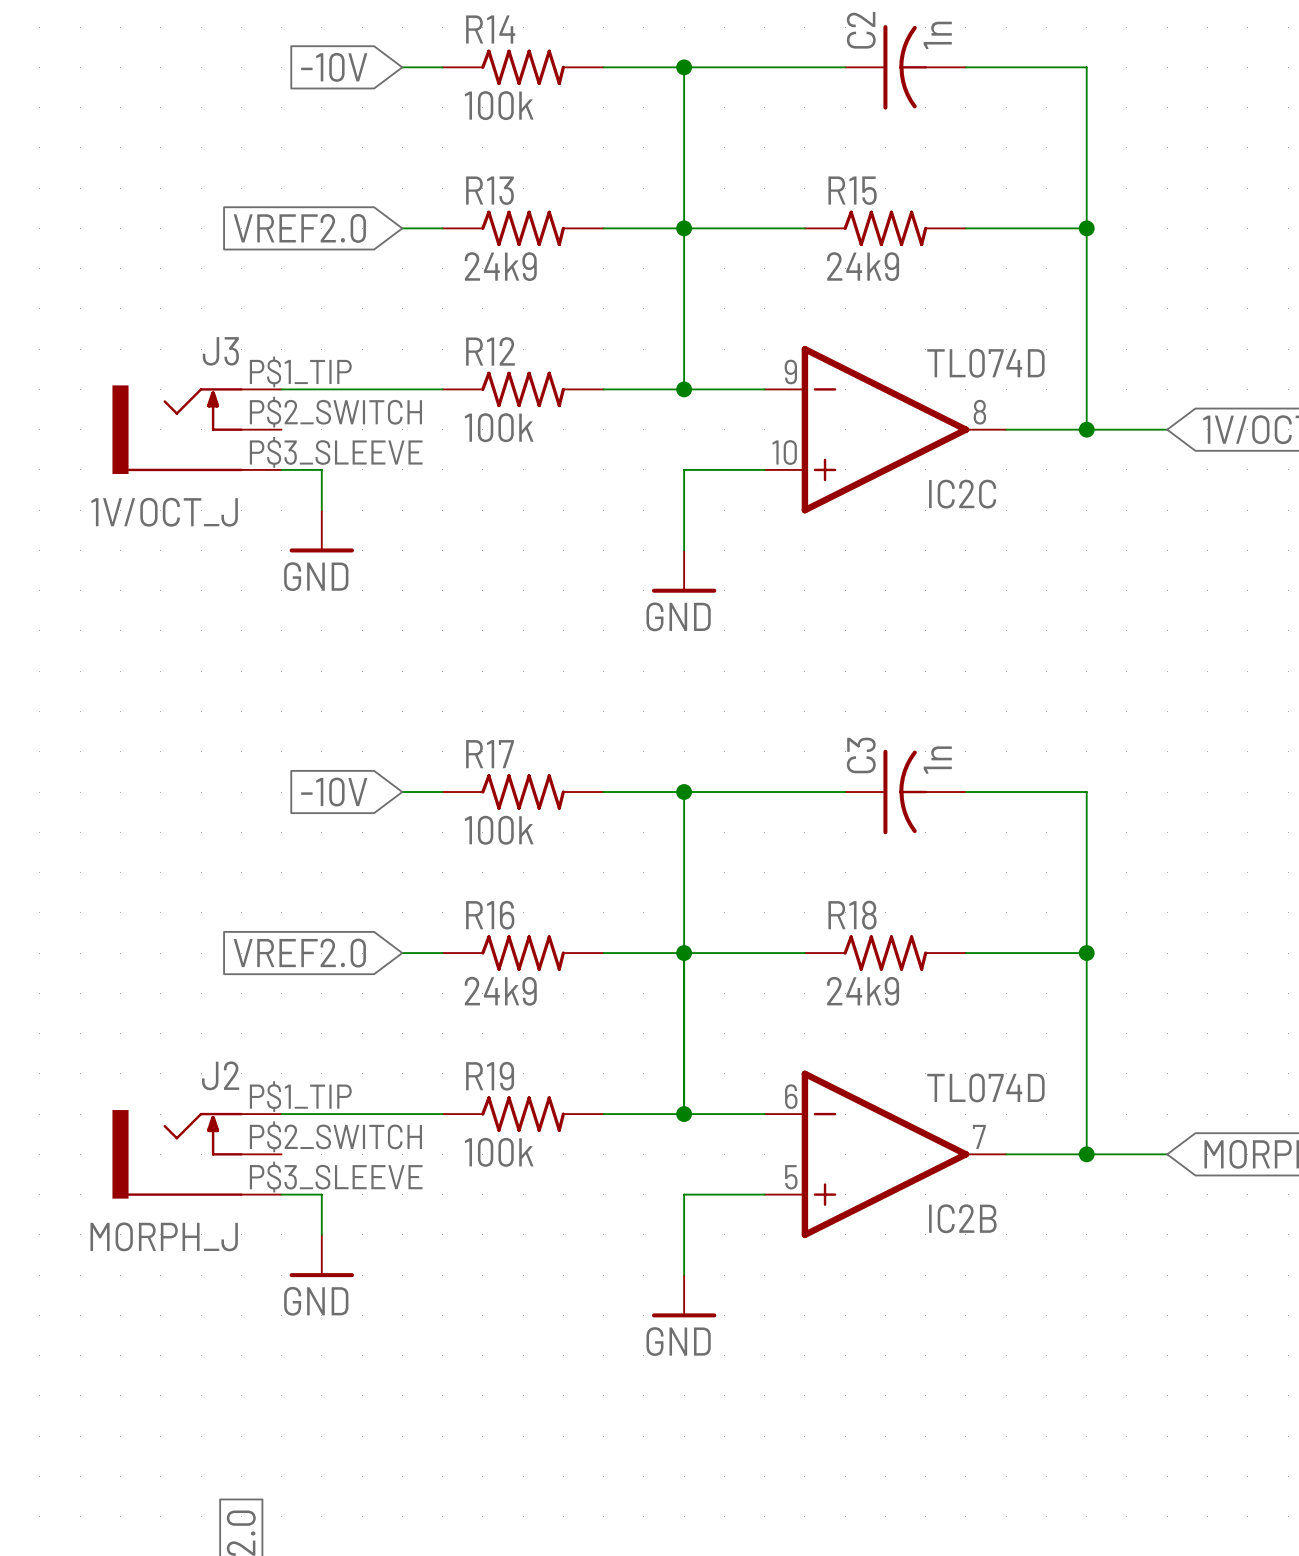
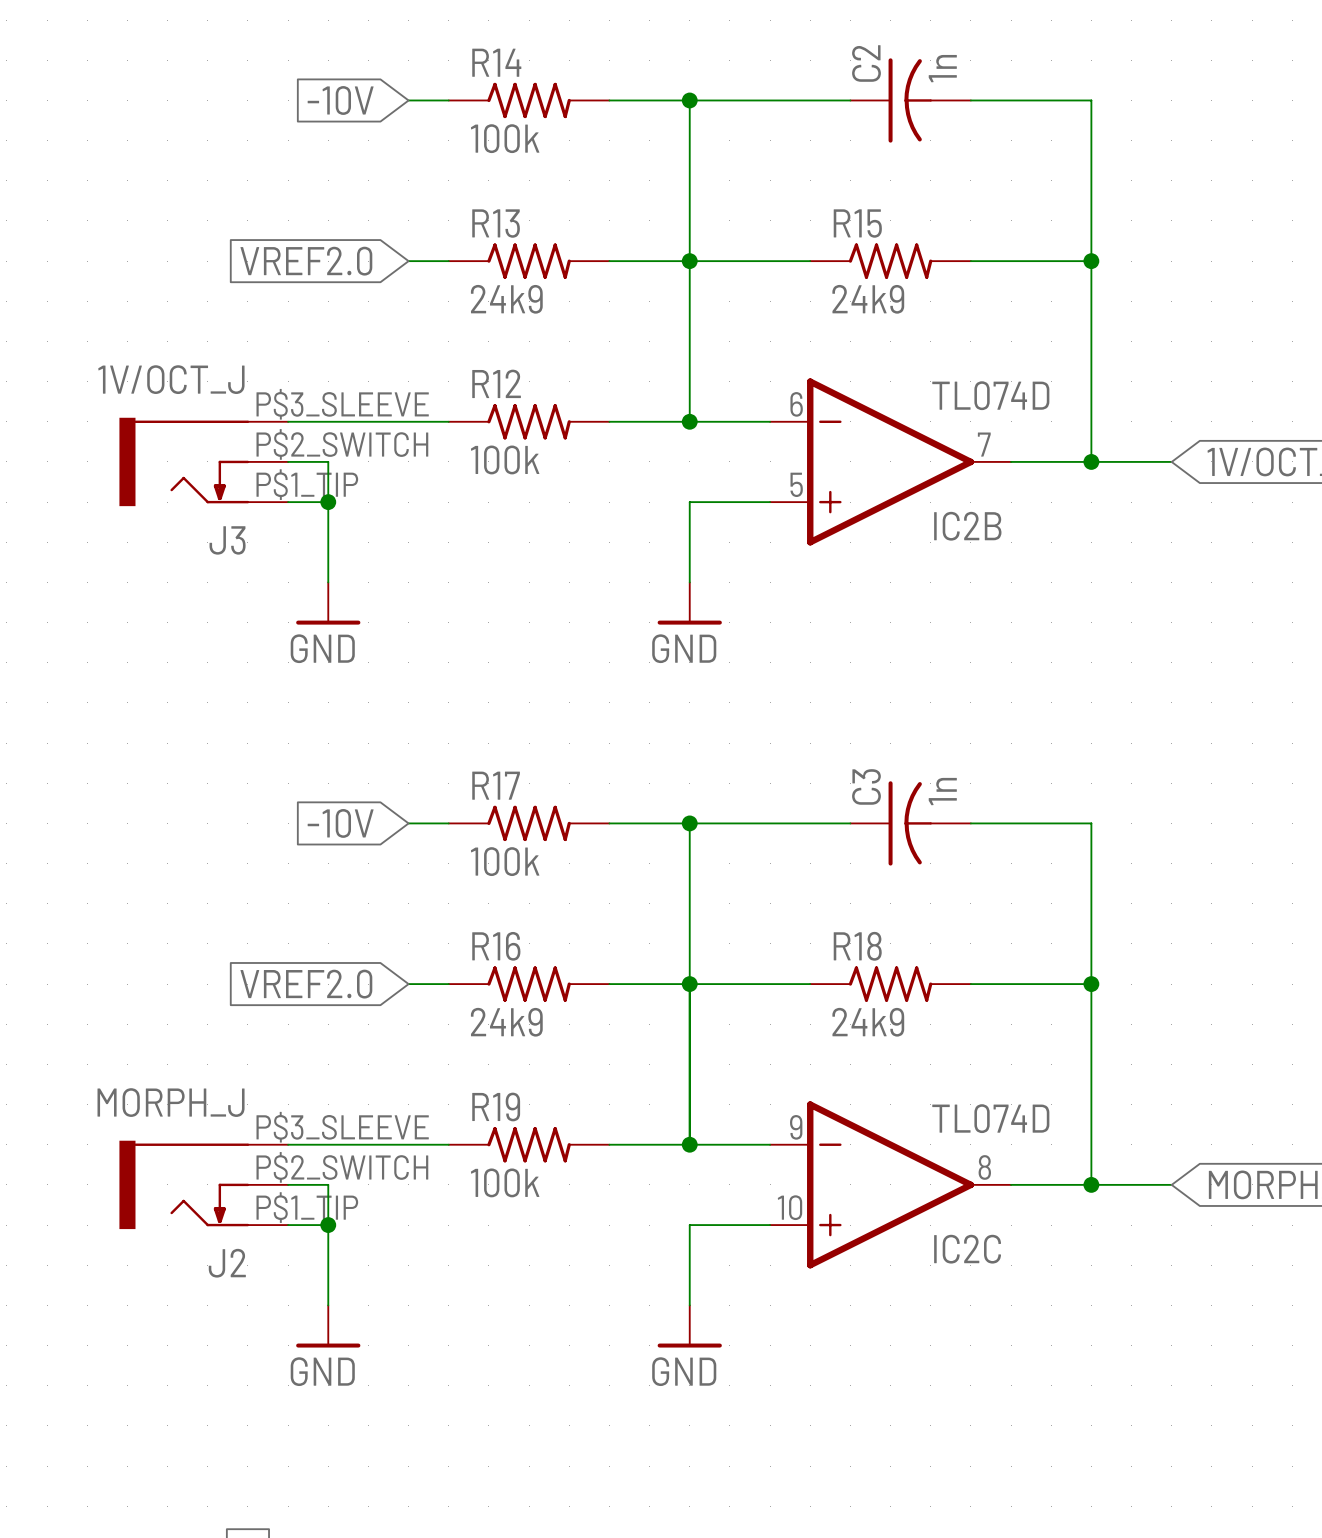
J3 flip: as is (177, 429) -> up-down (184, 461)
wire: none -> (288, 461) (328, 461) (328, 502)
IC2C position: (885, 429) -> (890, 1184)
junction: none -> (328, 502)
power symbol position: GND (321, 531) -> GND (328, 603)
J2 flip: as is (177, 1154) -> up-down (184, 1184)
wire: none -> (288, 1184) (328, 1184) (328, 1225)
IC2B position: (885, 1154) -> (890, 461)
junction: none -> (328, 1225)
power symbol position: GND (321, 1255) -> GND (328, 1326)

